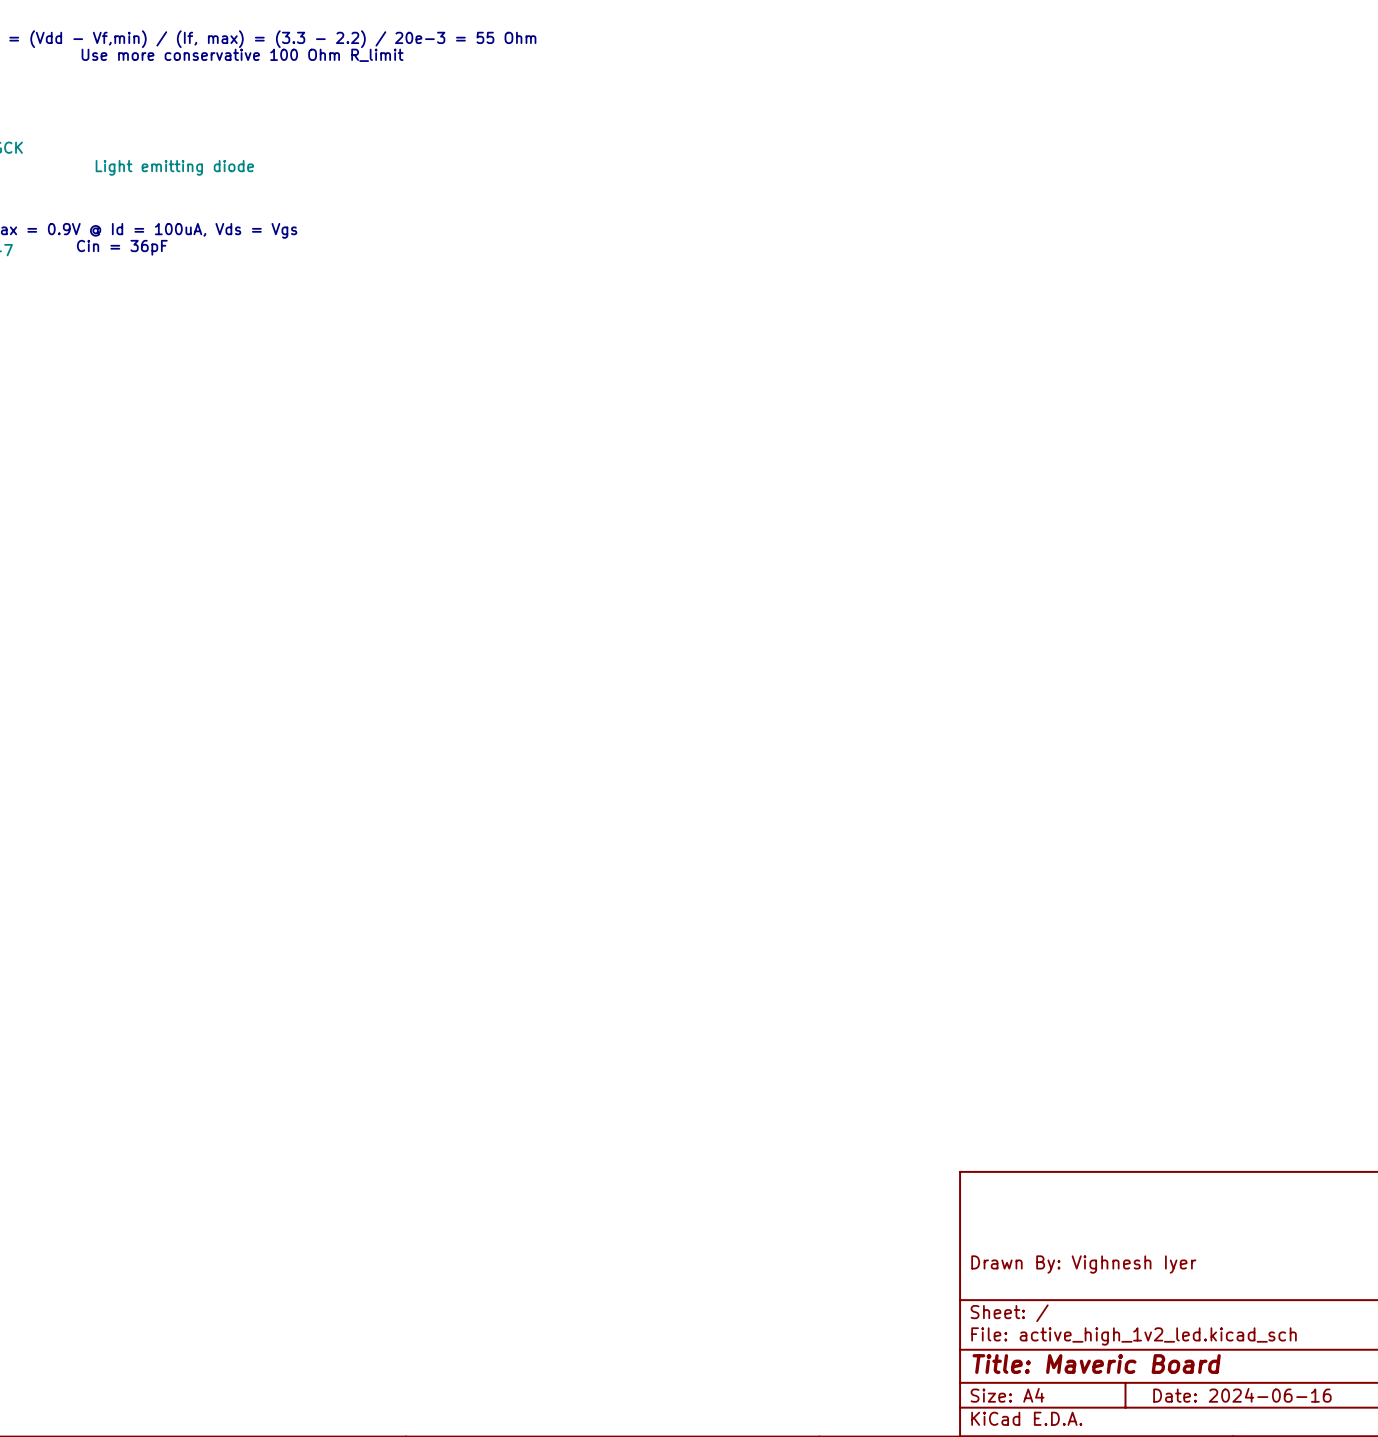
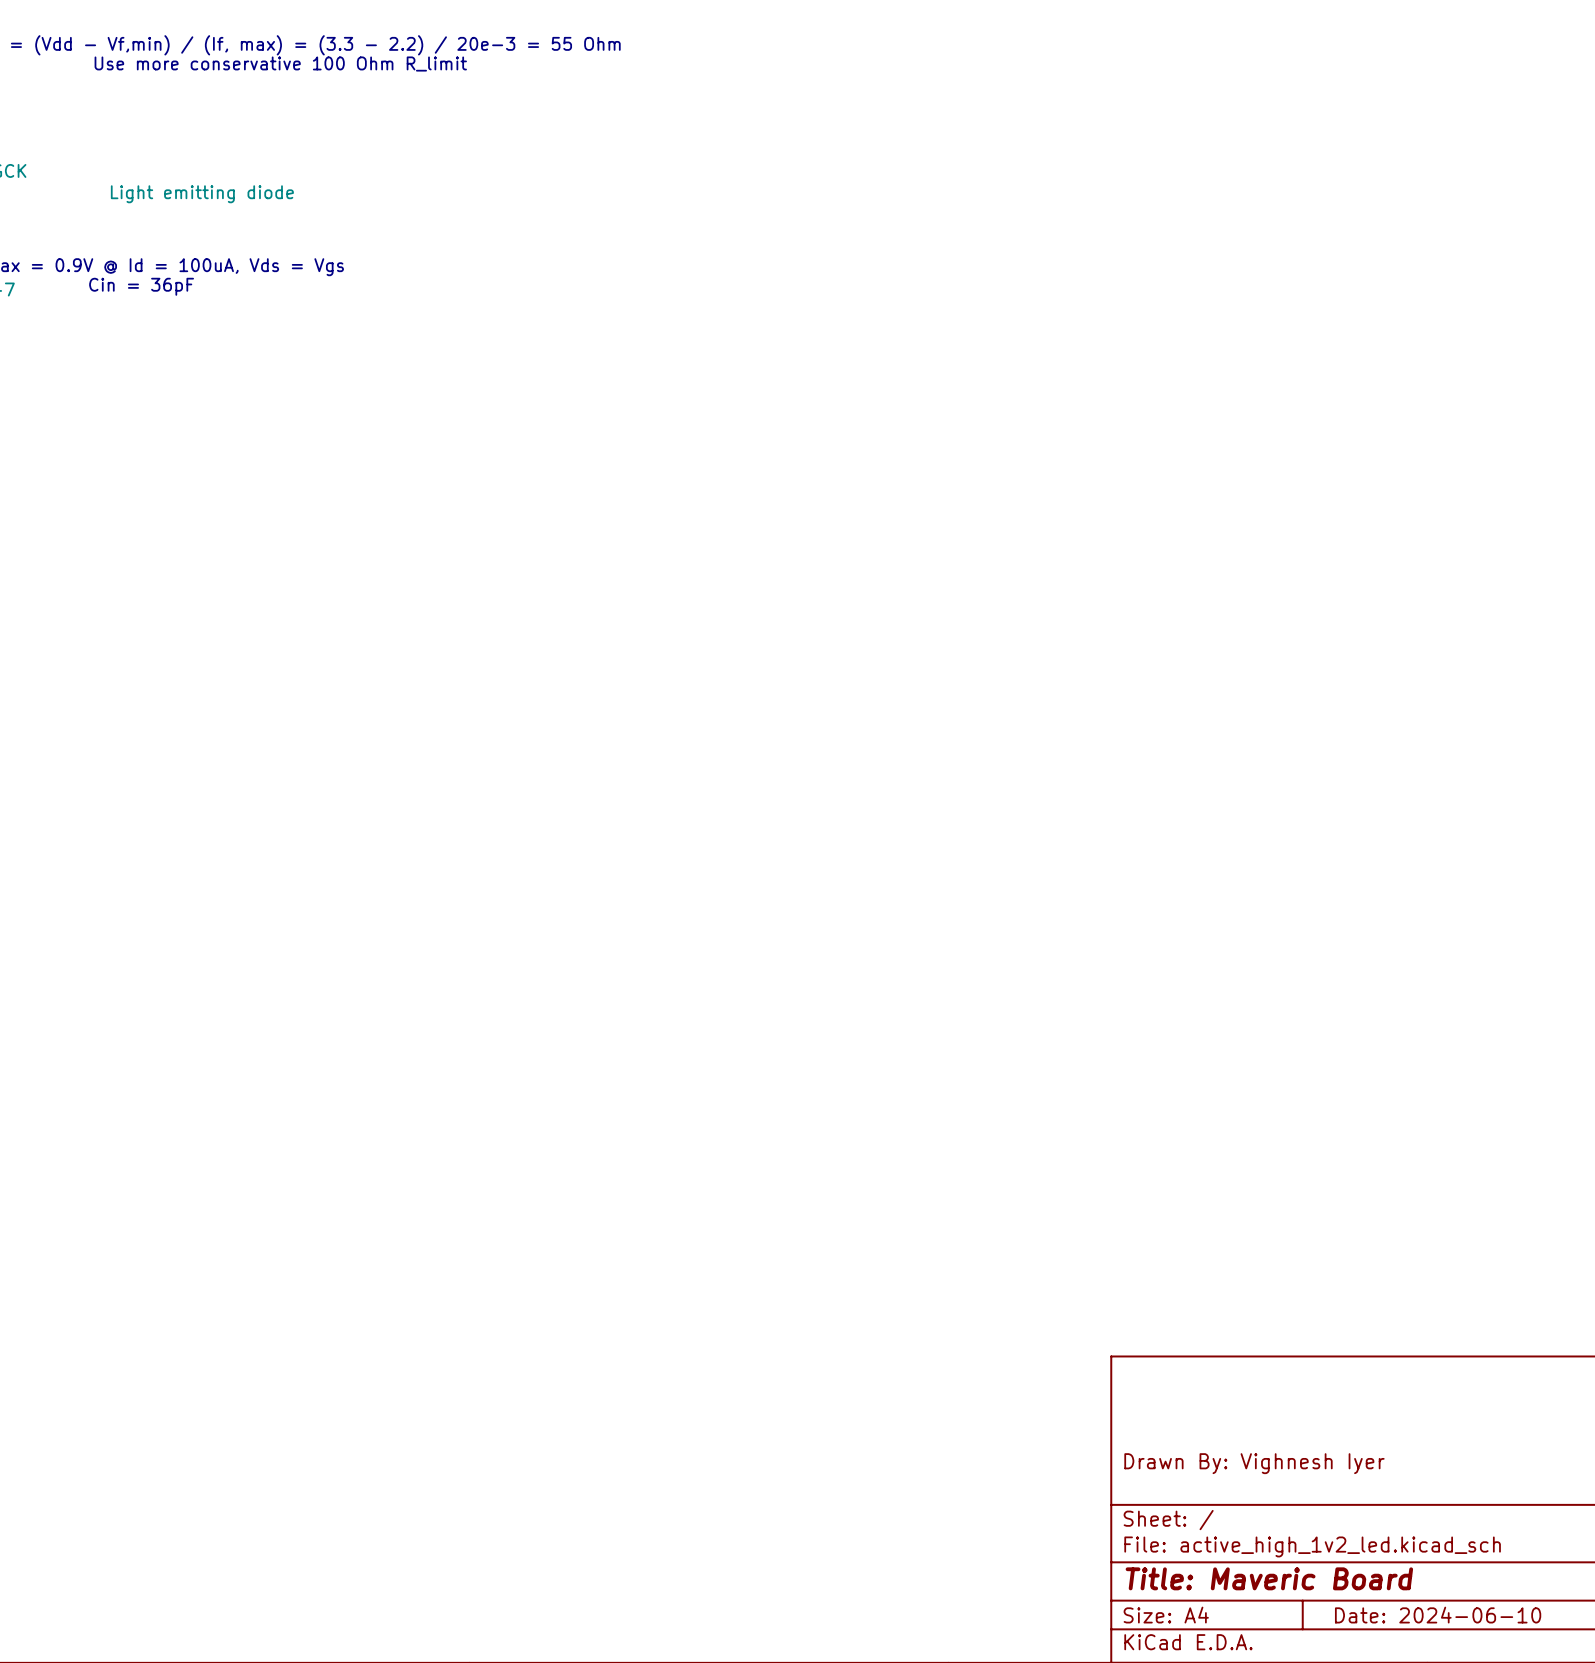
title block: Date: 2024-06-16 (1242, 1395) -> Date: 2024-06-10 (1438, 1615)

